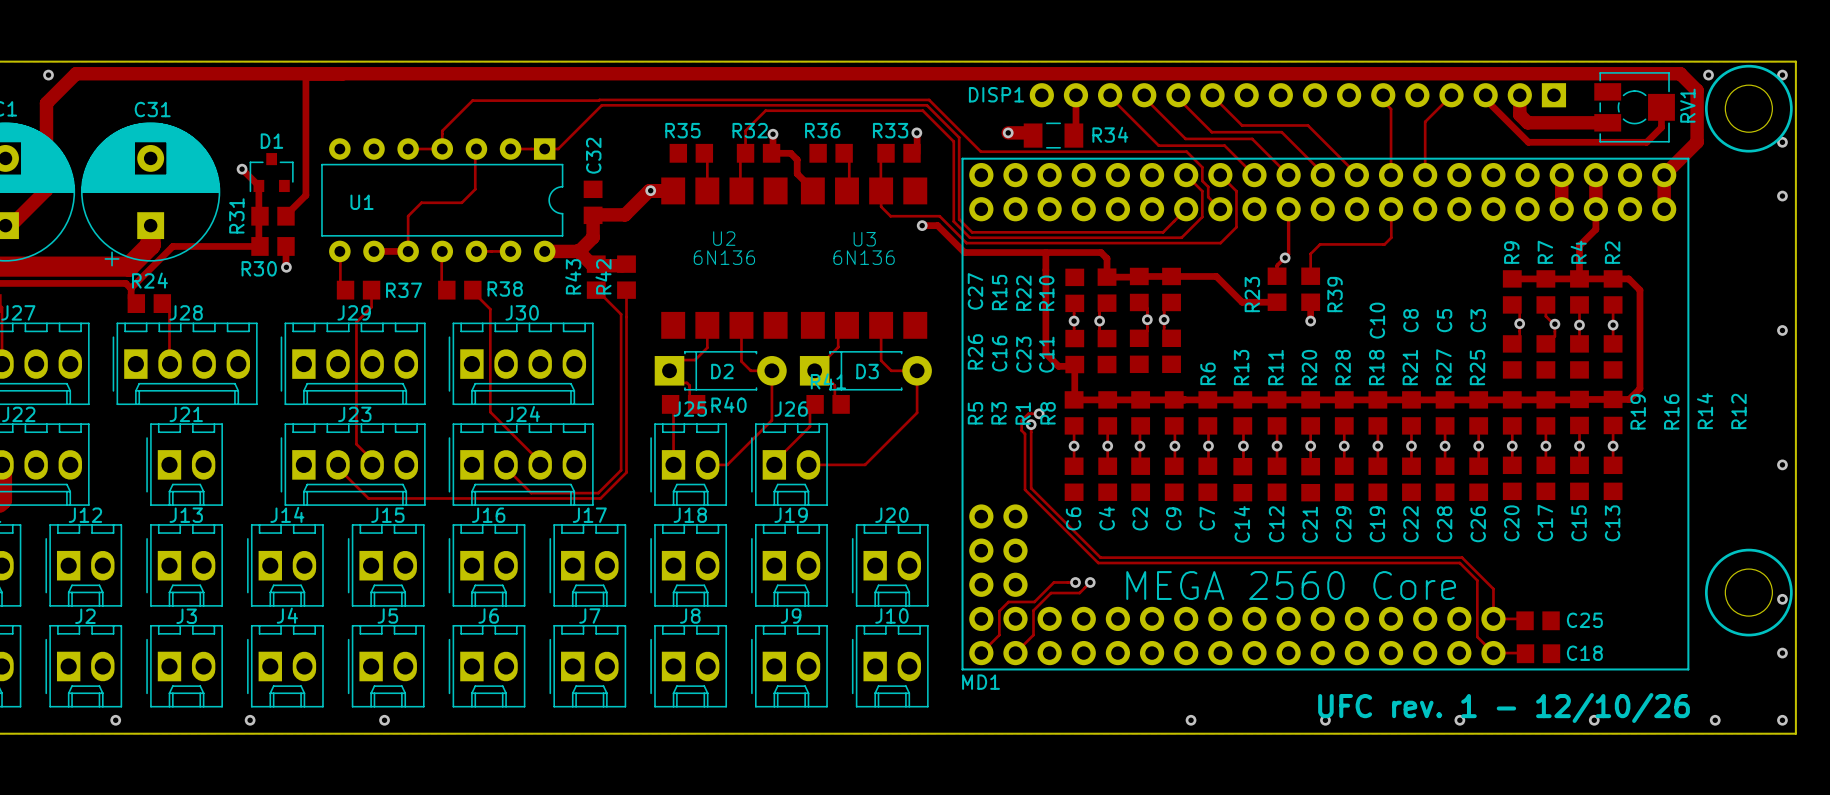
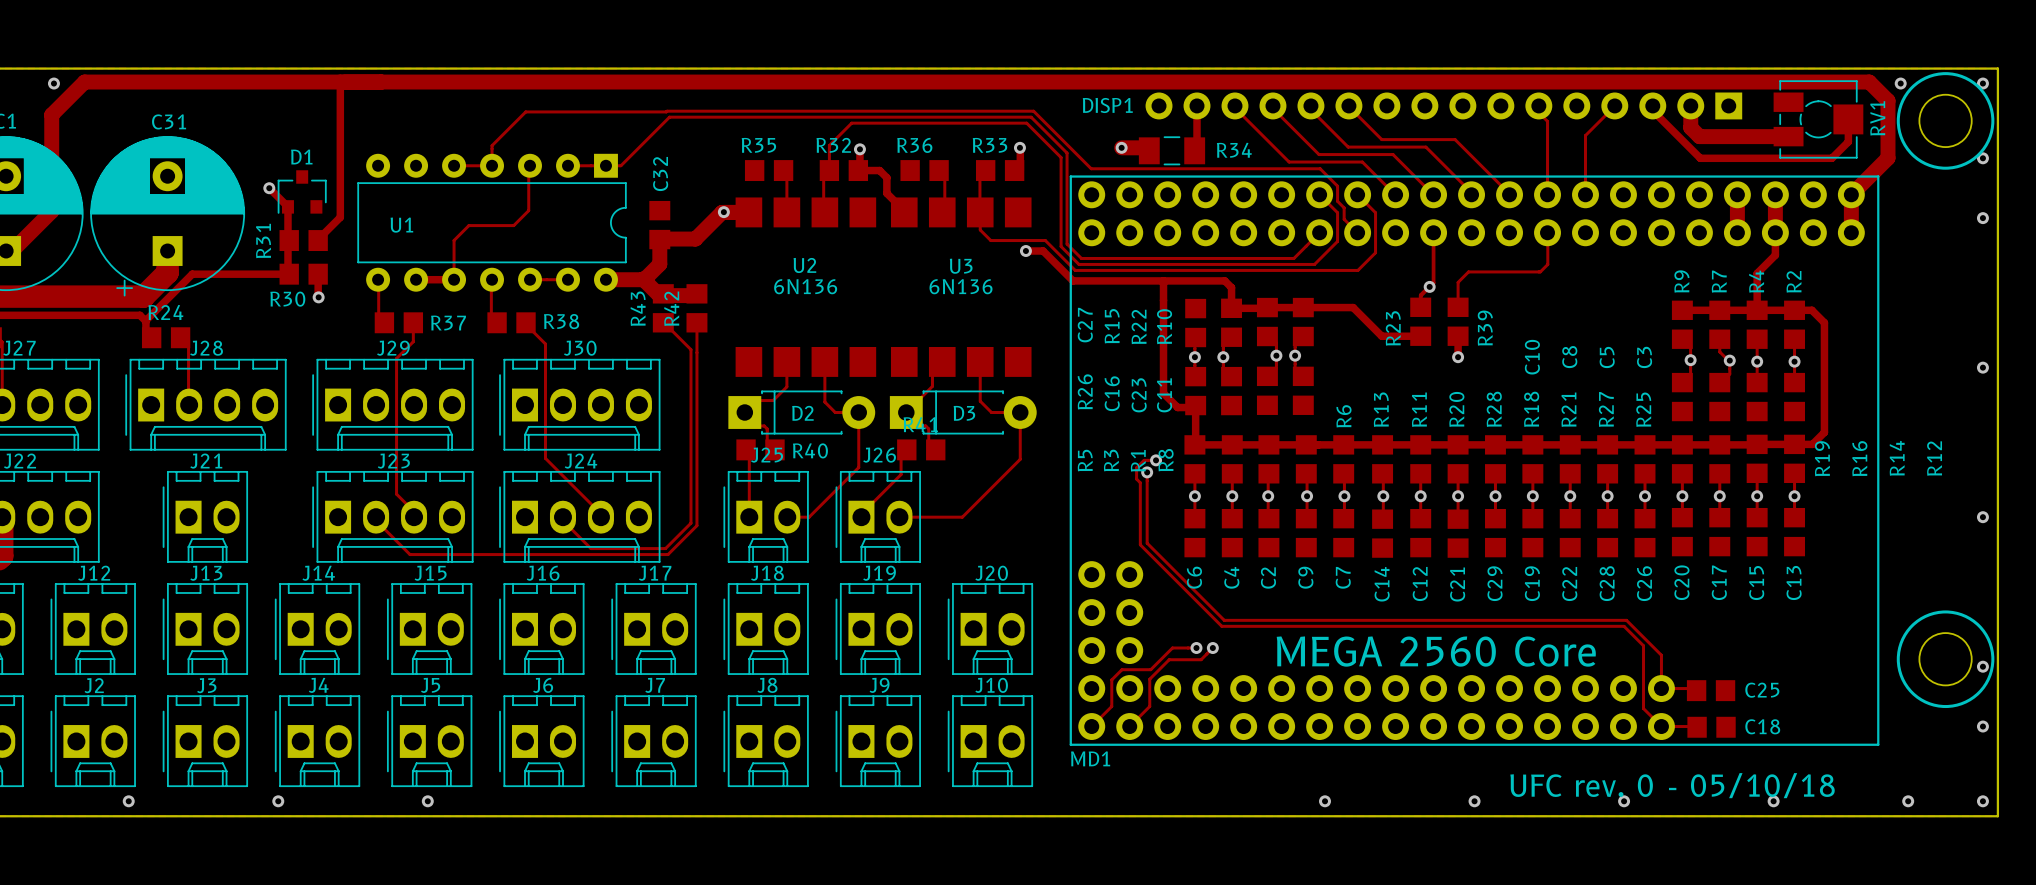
text: UFC rev. 1 - 12/10/26 (1504, 708) -> UFC rev. 0 - 05/10/18 (1672, 785)

